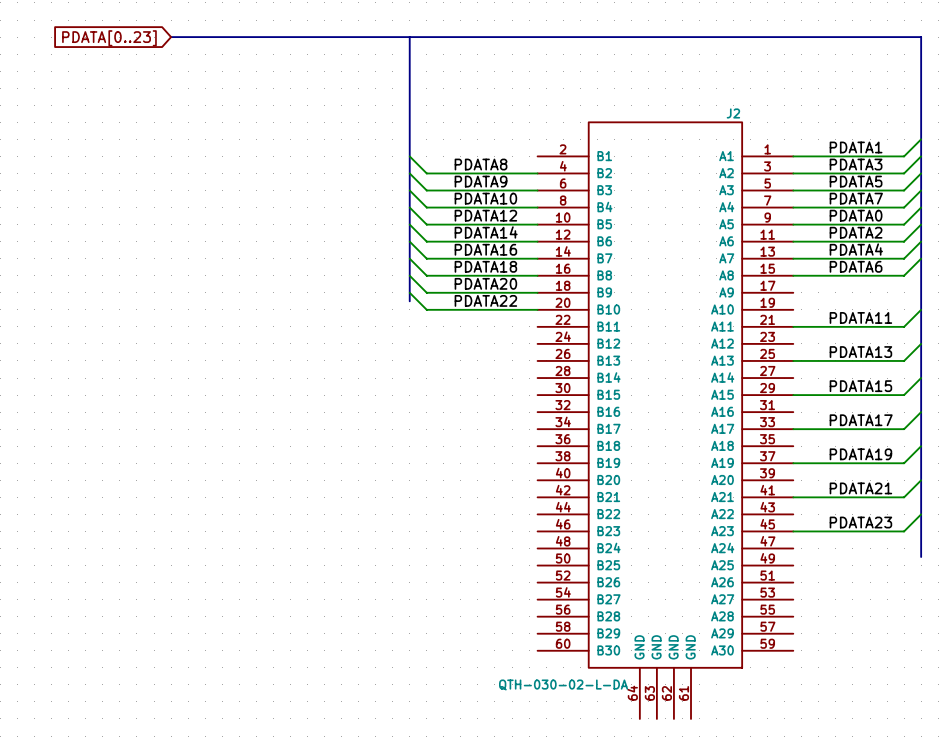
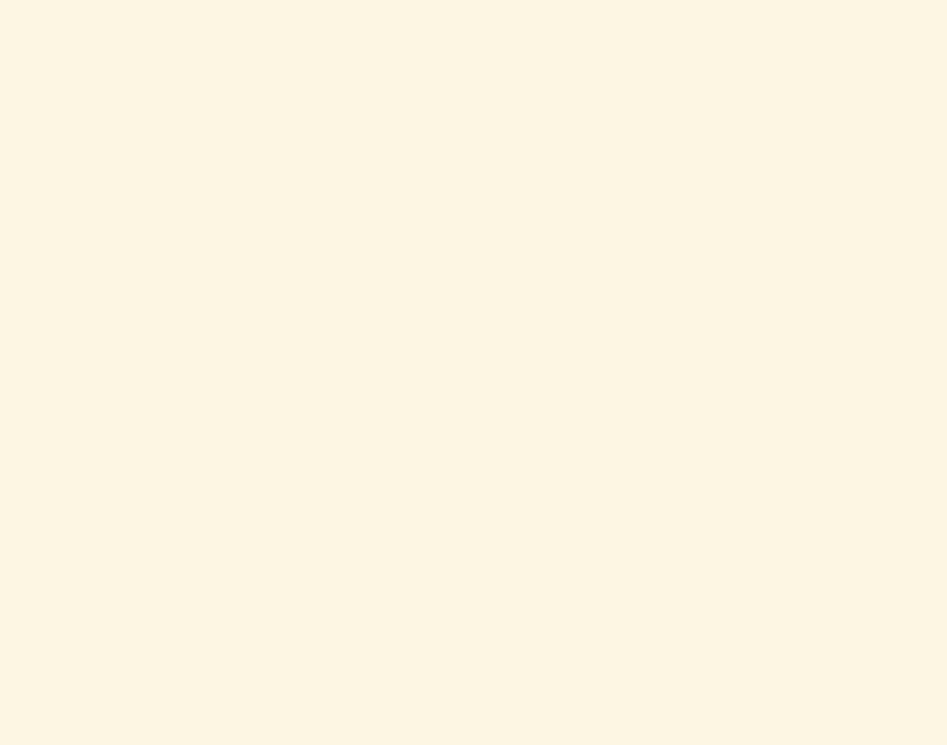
bus: (171, 37) (921, 37) (921, 557) -> none
bus: (409, 37) (409, 301) -> none
global label: PDATA[0..23] (109, 38) -> none
wire: (921, 139) (904, 156) (793, 156) -> none
label: PDATA1 (856, 147) -> none
wire: (409, 156) (426, 173) (537, 173) -> none
wire: (921, 156) (904, 173) (793, 173) -> none
label: PDATA8 (481, 164) -> none
label: PDATA3 (856, 164) -> none
wire: (409, 173) (426, 190) (537, 190) -> none
wire: (921, 173) (904, 190) (793, 190) -> none
label: PDATA9 (481, 181) -> none
label: PDATA5 (856, 181) -> none
wire: (409, 190) (426, 207) (537, 207) -> none
wire: (921, 190) (904, 207) (793, 207) -> none
label: PDATA10 (485, 198) -> none
label: PDATA7 (856, 198) -> none
wire: (409, 207) (426, 224) (537, 224) -> none
wire: (921, 207) (904, 224) (793, 224) -> none
label: PDATA12 (485, 215) -> none
label: PDATA0 (856, 215) -> none
wire: (409, 224) (426, 241) (537, 241) -> none
wire: (921, 224) (904, 241) (793, 241) -> none
label: PDATA14 (486, 232) -> none
label: PDATA2 (856, 232) -> none
wire: (409, 241) (426, 258) (537, 258) -> none
wire: (921, 241) (904, 258) (793, 258) -> none
label: PDATA16 (485, 249) -> none
label: PDATA4 (856, 249) -> none
wire: (409, 258) (426, 275) (537, 275) -> none
wire: (921, 258) (904, 275) (793, 275) -> none
label: PDATA18 (485, 266) -> none
label: PDATA6 (856, 266) -> none
wire: (409, 275) (426, 292) (537, 292) -> none
label: PDATA20 (485, 283) -> none
wire: (409, 292) (426, 309) (537, 309) -> none
label: PDATA22 (485, 300) -> none
wire: (921, 309) (904, 326) (793, 326) -> none
label: PDATA11 (860, 317) -> none
wire: (921, 343) (904, 360) (793, 360) -> none
label: PDATA13 (860, 352) -> none
wire: (921, 378) (904, 395) (793, 395) -> none
label: PDATA15 (860, 386) -> none
wire: (921, 412) (904, 429) (793, 429) -> none
J2: QTH-030-02-L-DA (665, 420) -> none
label: PDATA17 (861, 420) -> none
wire: (921, 446) (904, 463) (793, 463) -> none
label: PDATA19 (860, 454) -> none
wire: (921, 480) (904, 497) (793, 497) -> none
label: PDATA21 (860, 488) -> none
wire: (921, 514) (904, 531) (793, 531) -> none
label: PDATA23 (860, 522) -> none

